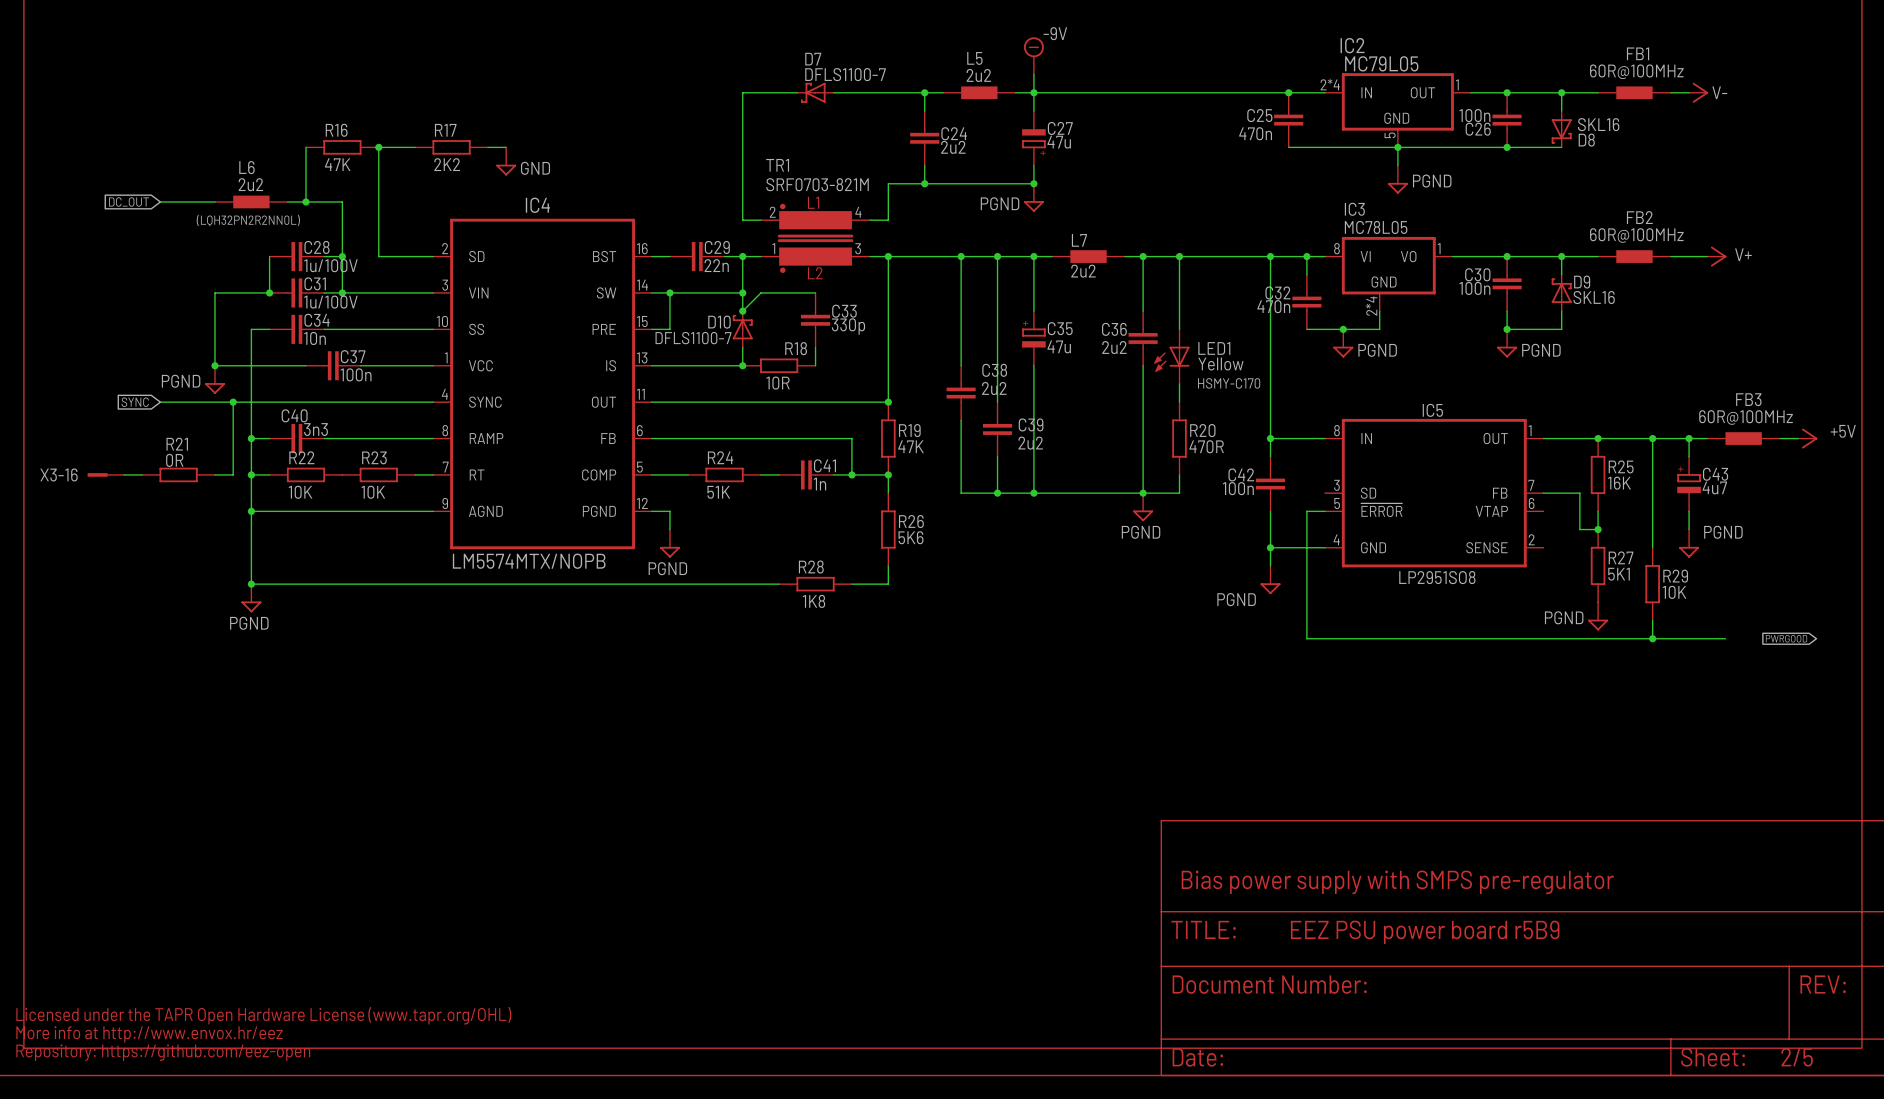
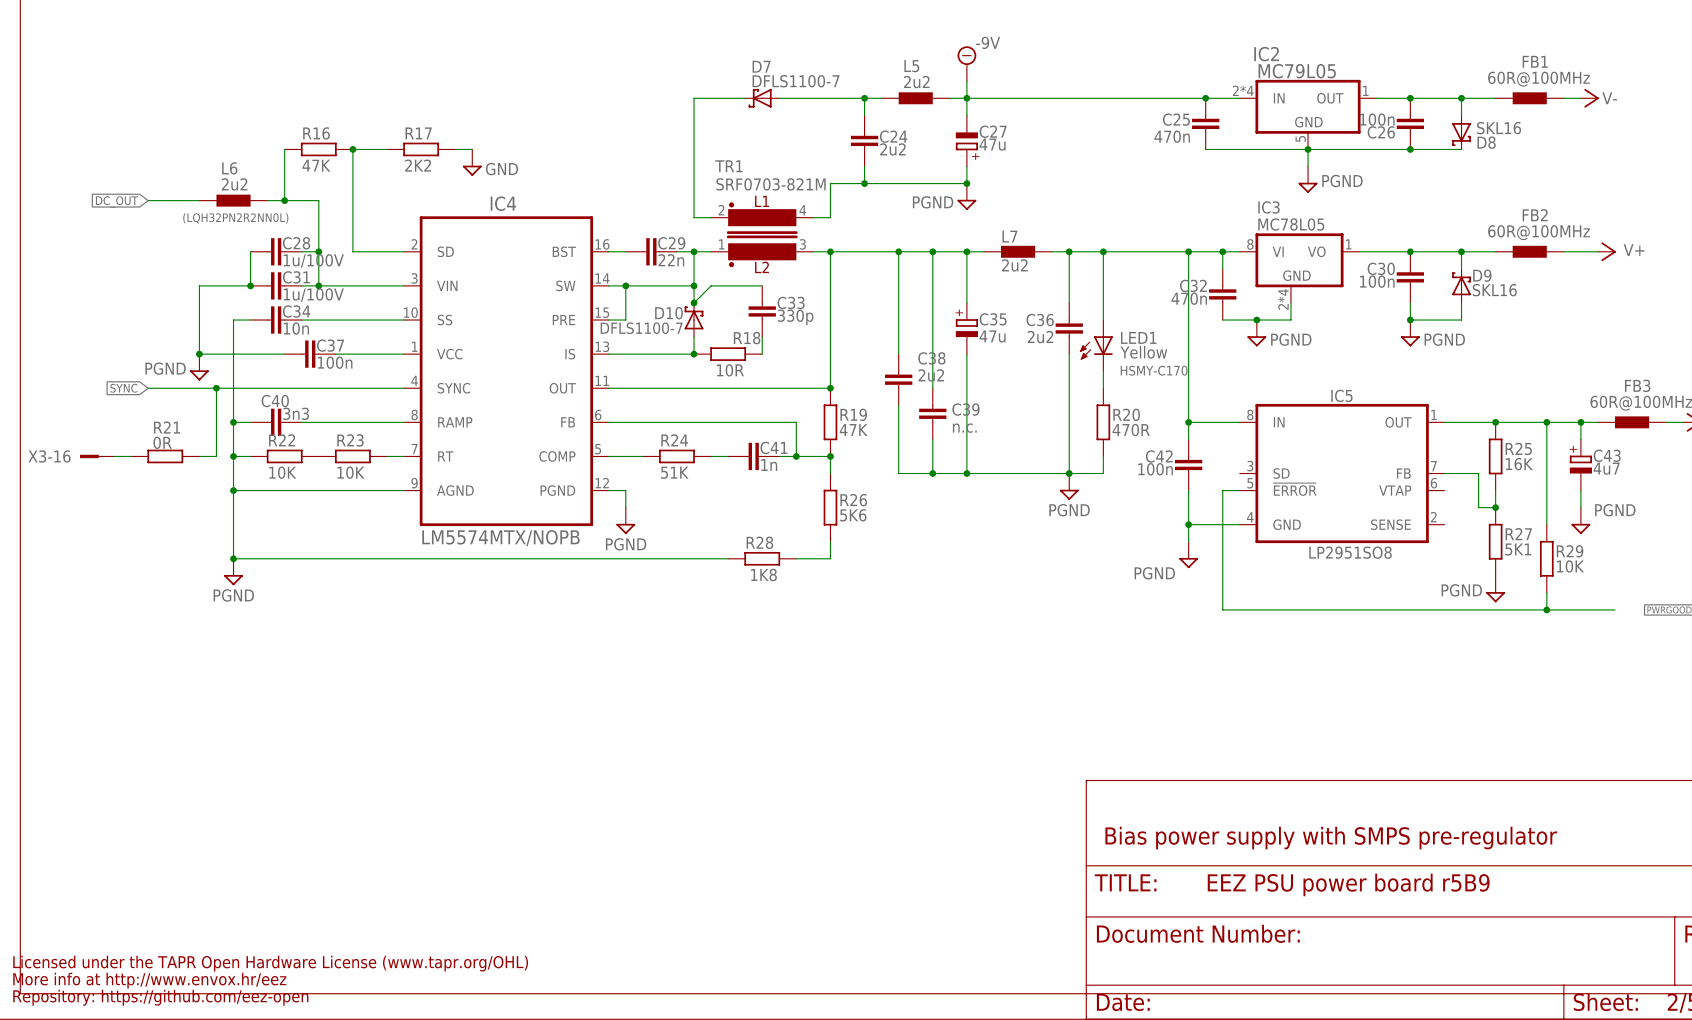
C39 value: 2u2 (1030, 443) -> n.c. (964, 428)

